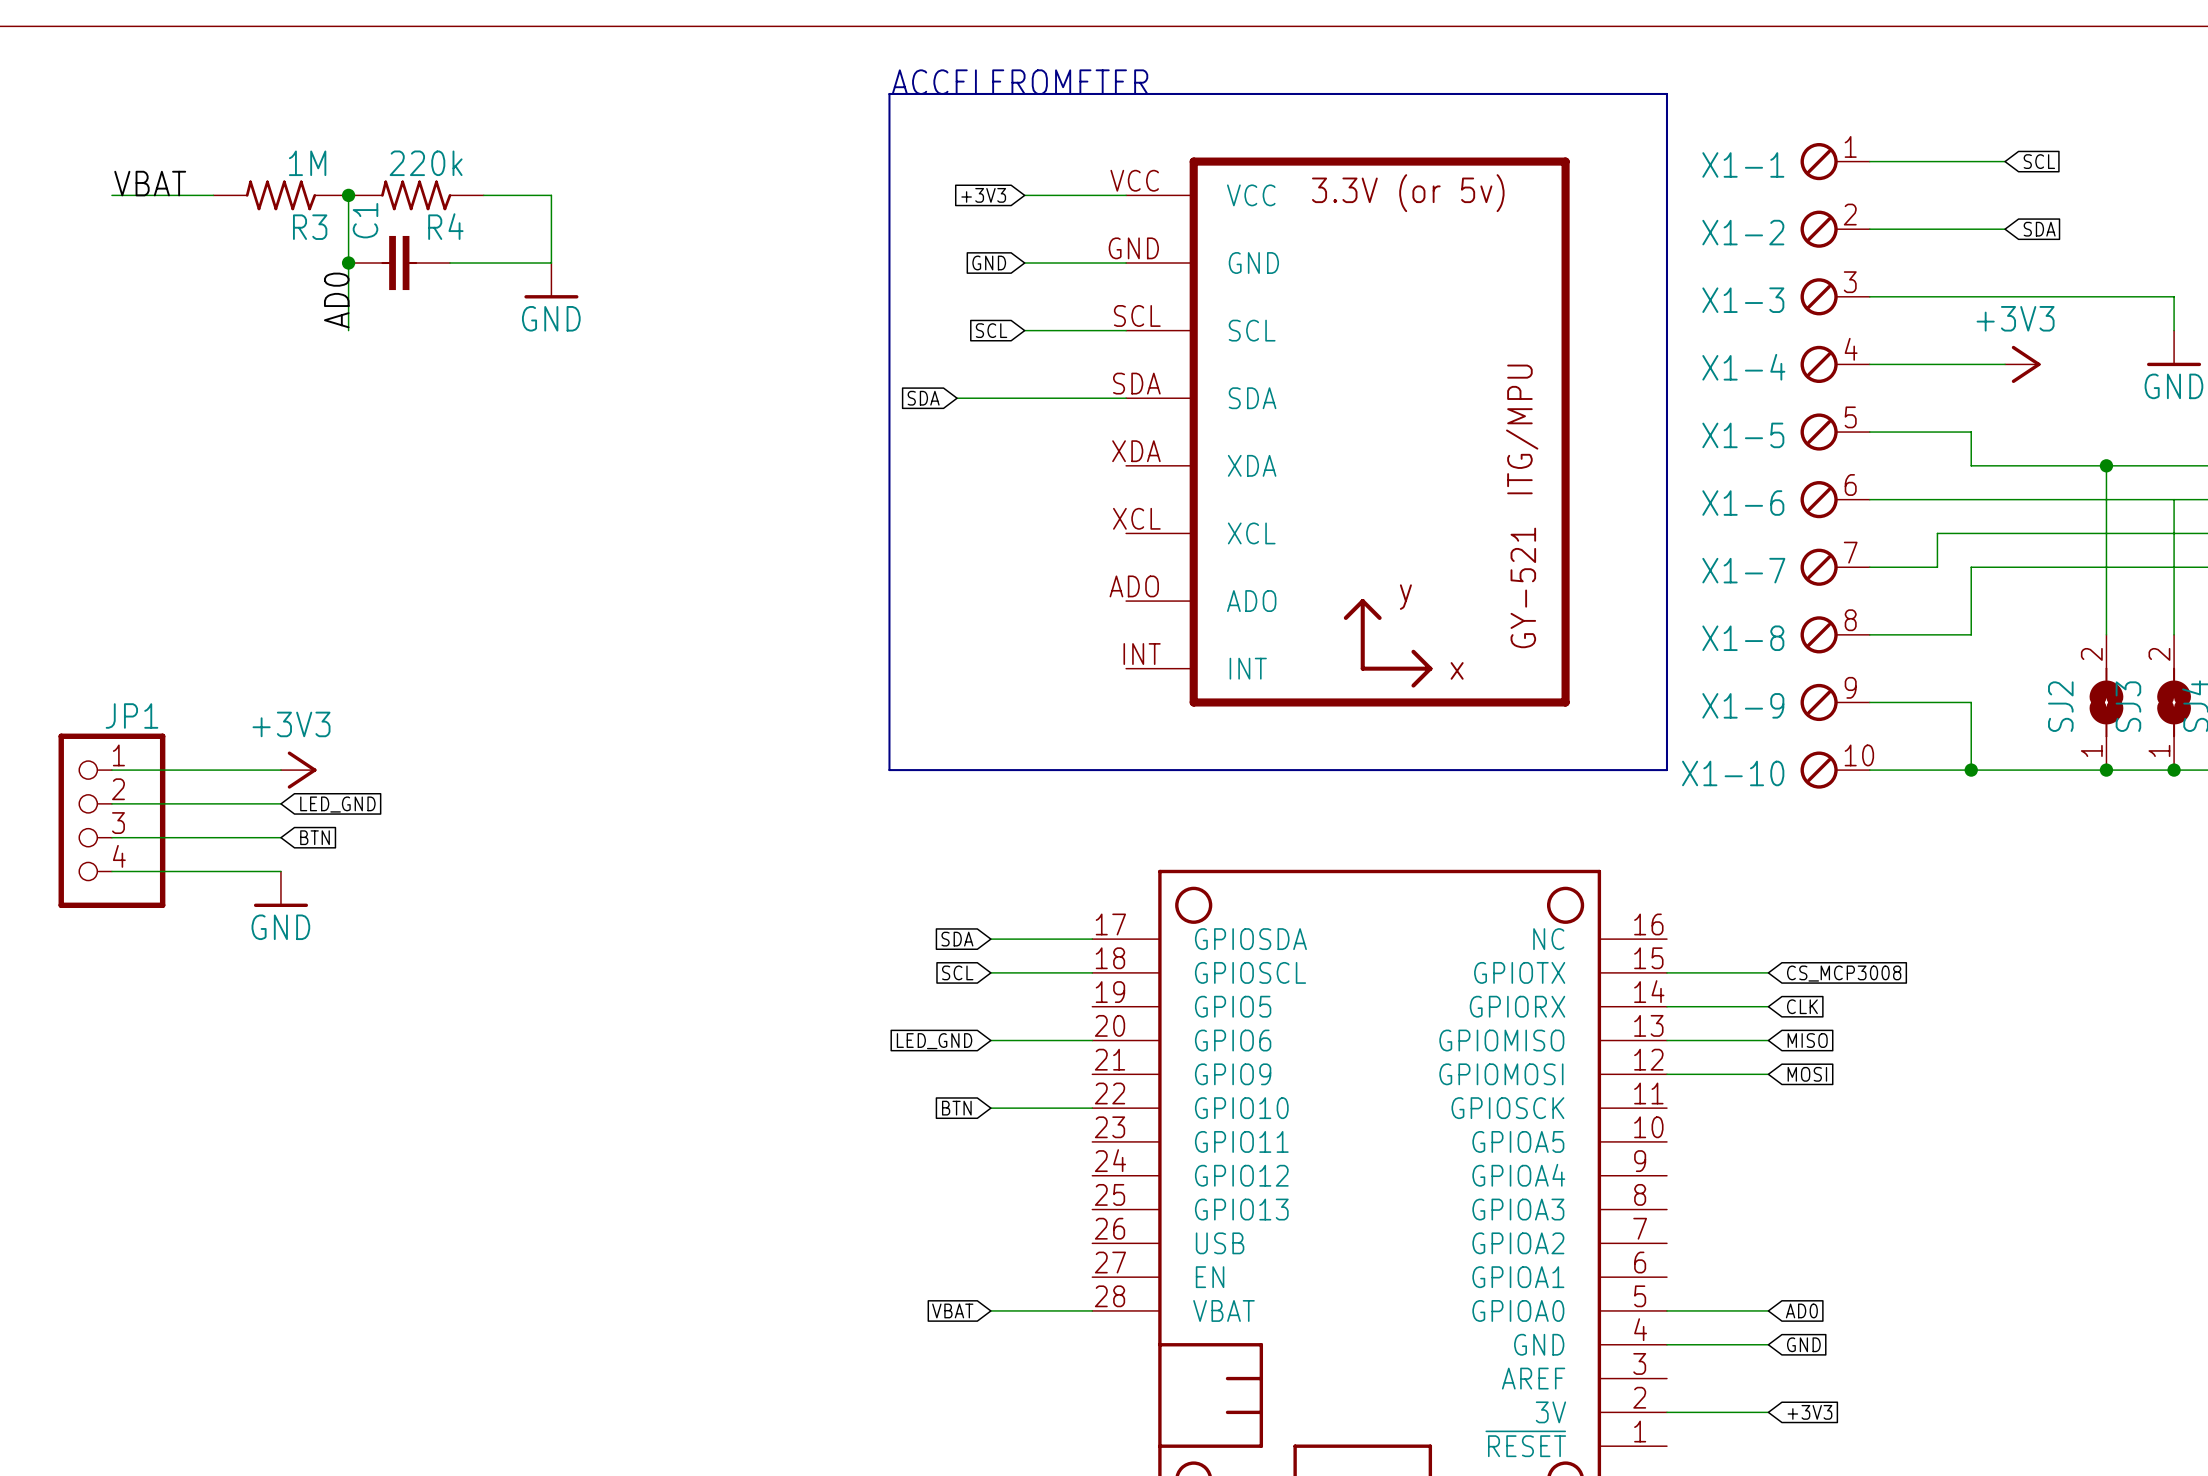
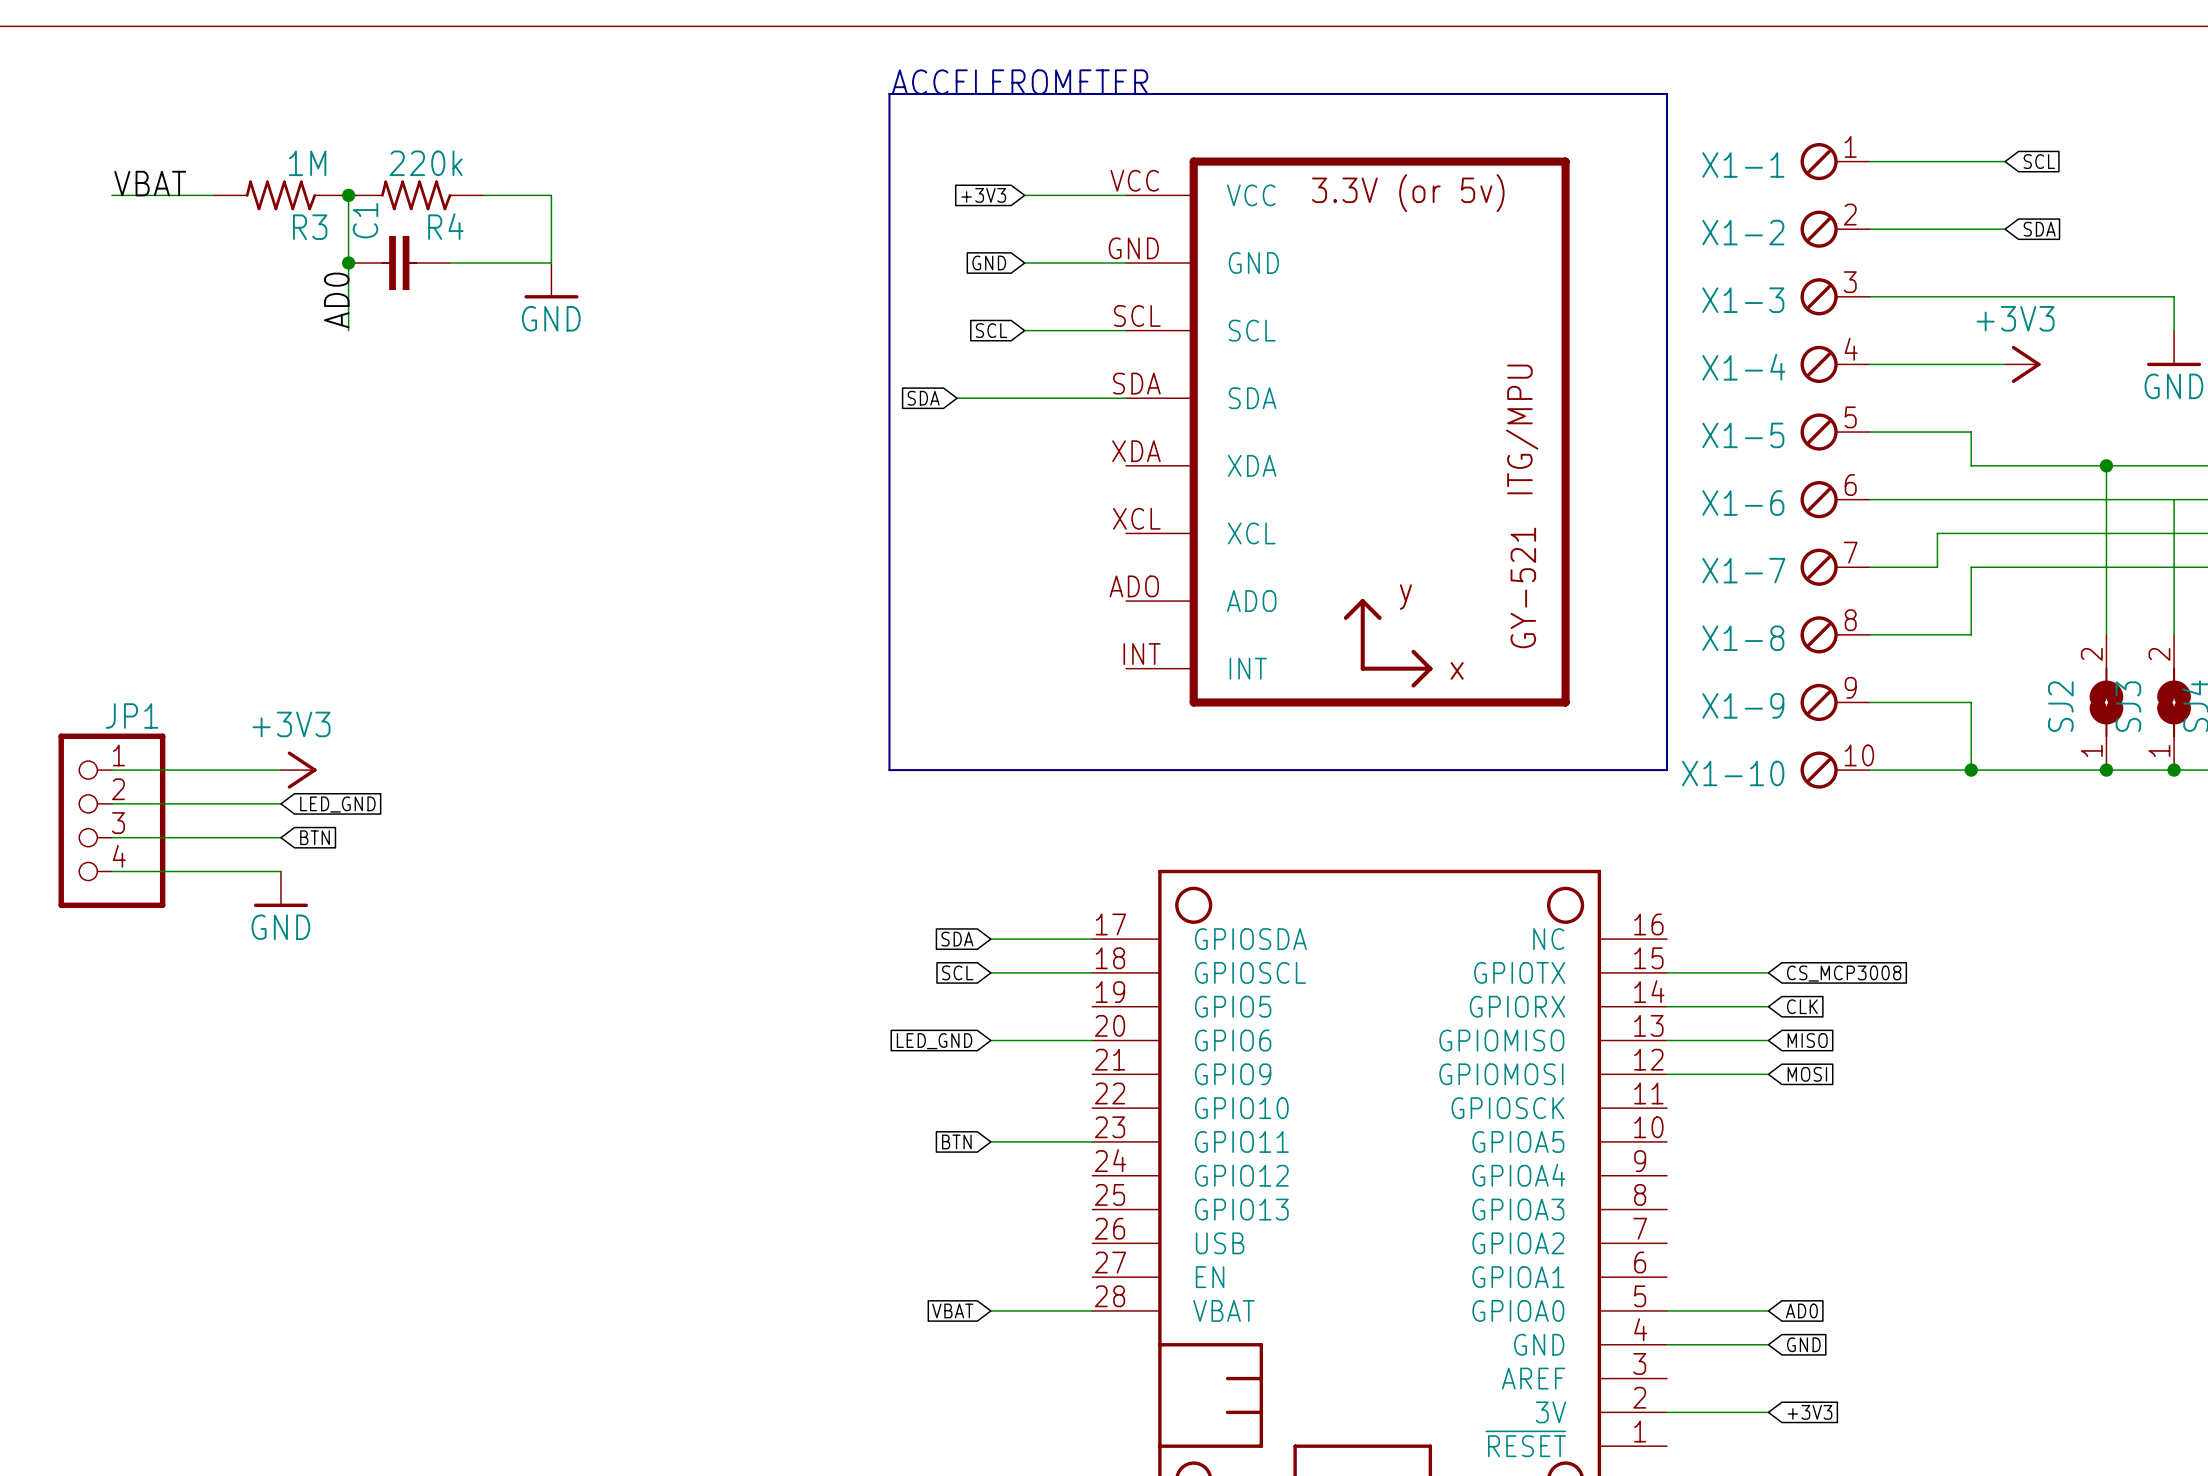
global label position: BTN (956, 1108) -> BTN (956, 1141)
wire: (990, 1108) (1092, 1108) -> (990, 1141) (1092, 1141)

